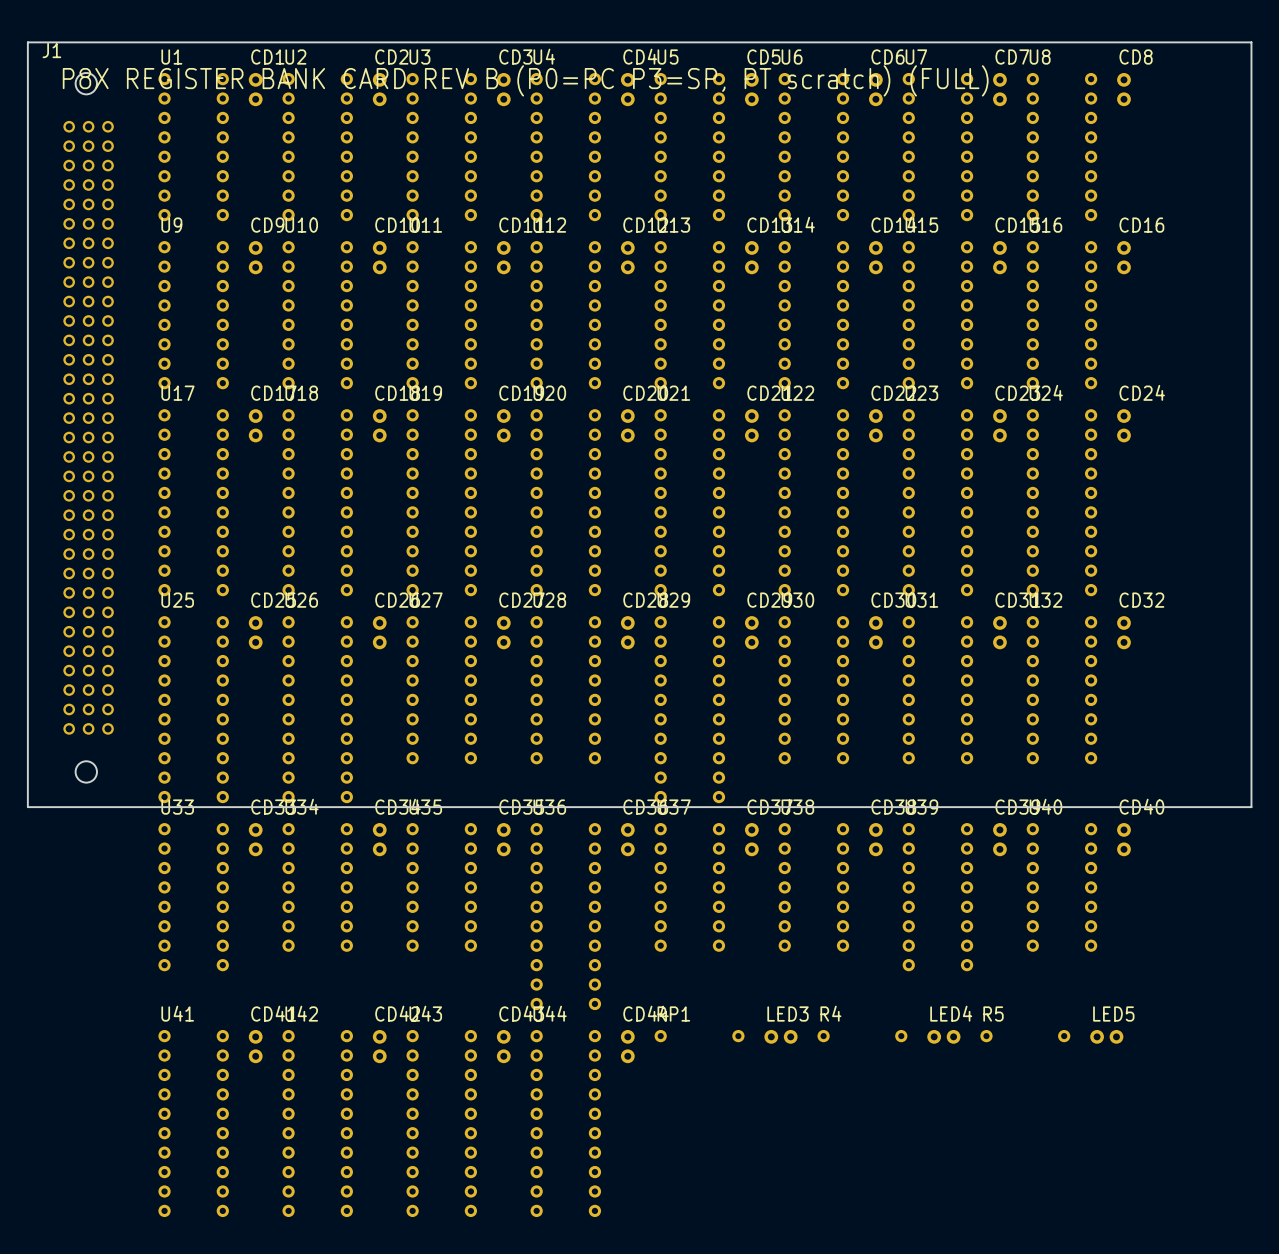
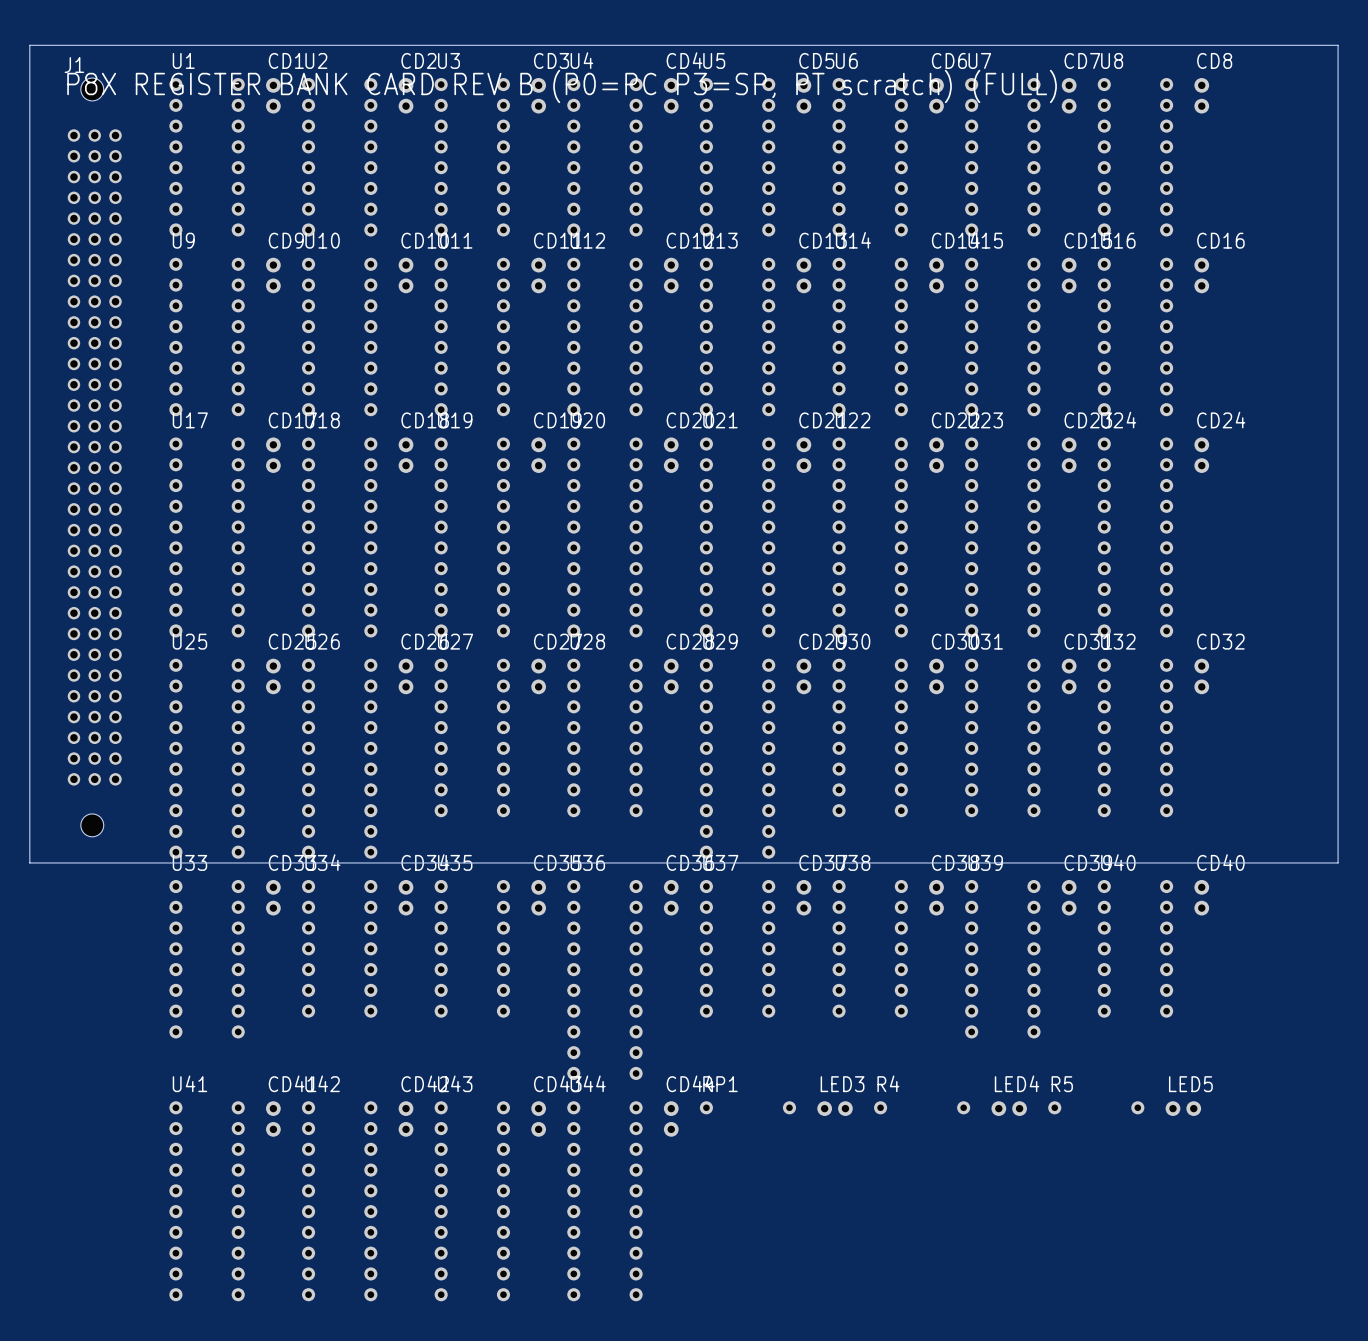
J1 name position: J1 (51, 50) -> J1 (74, 65)

